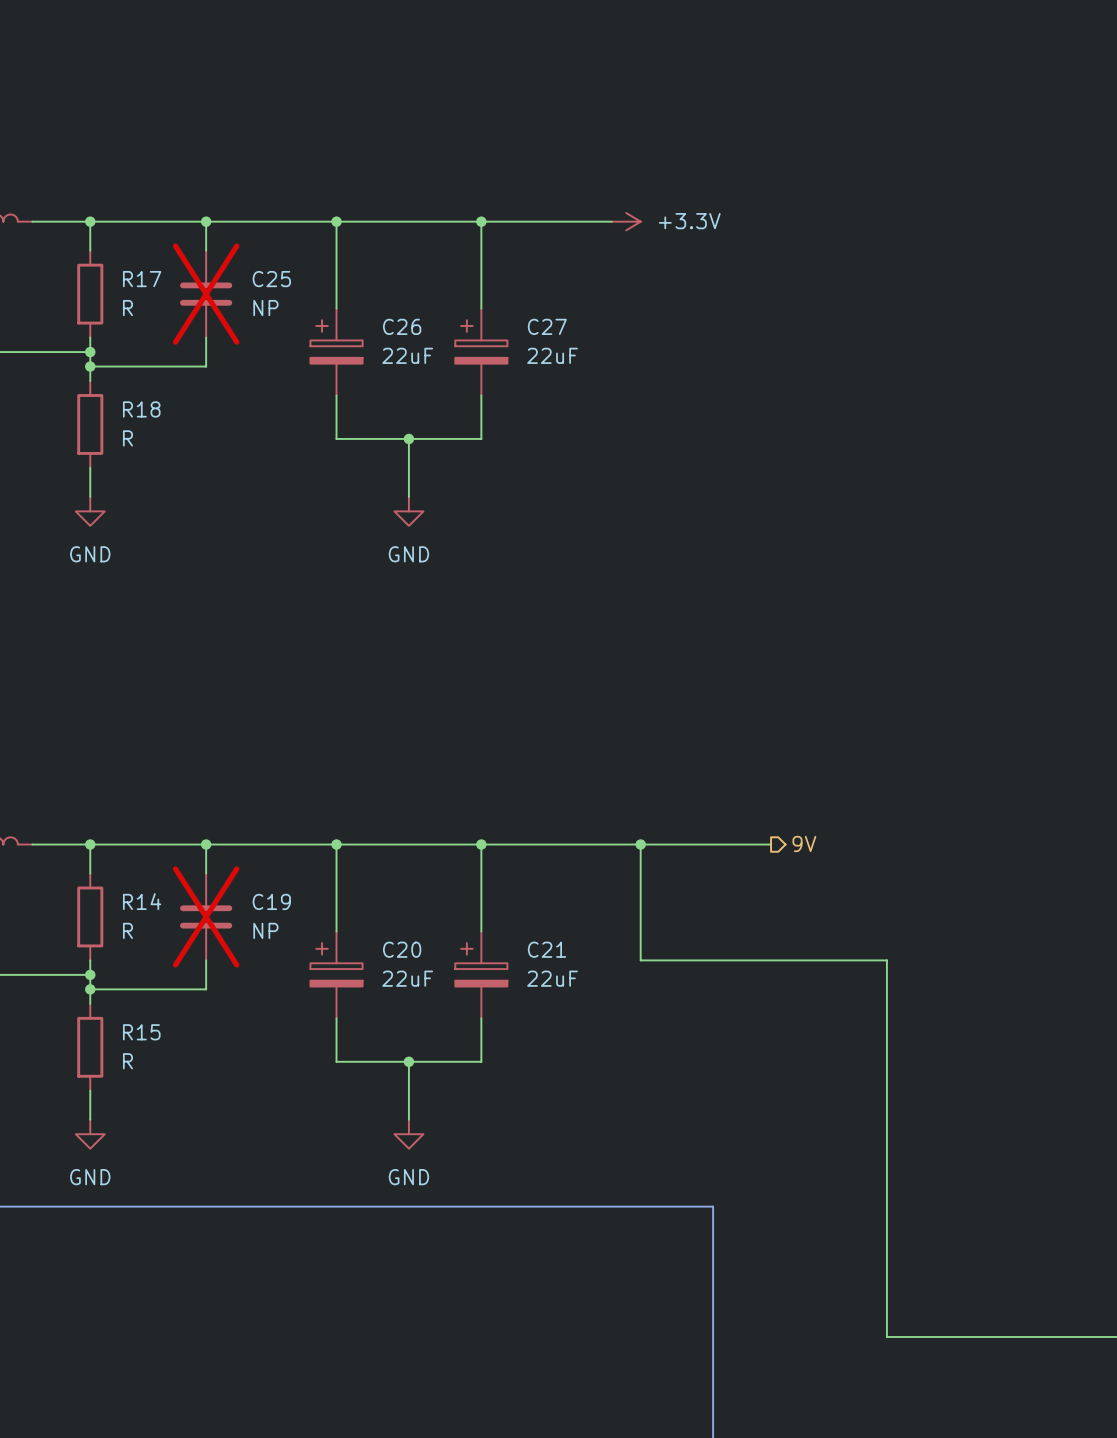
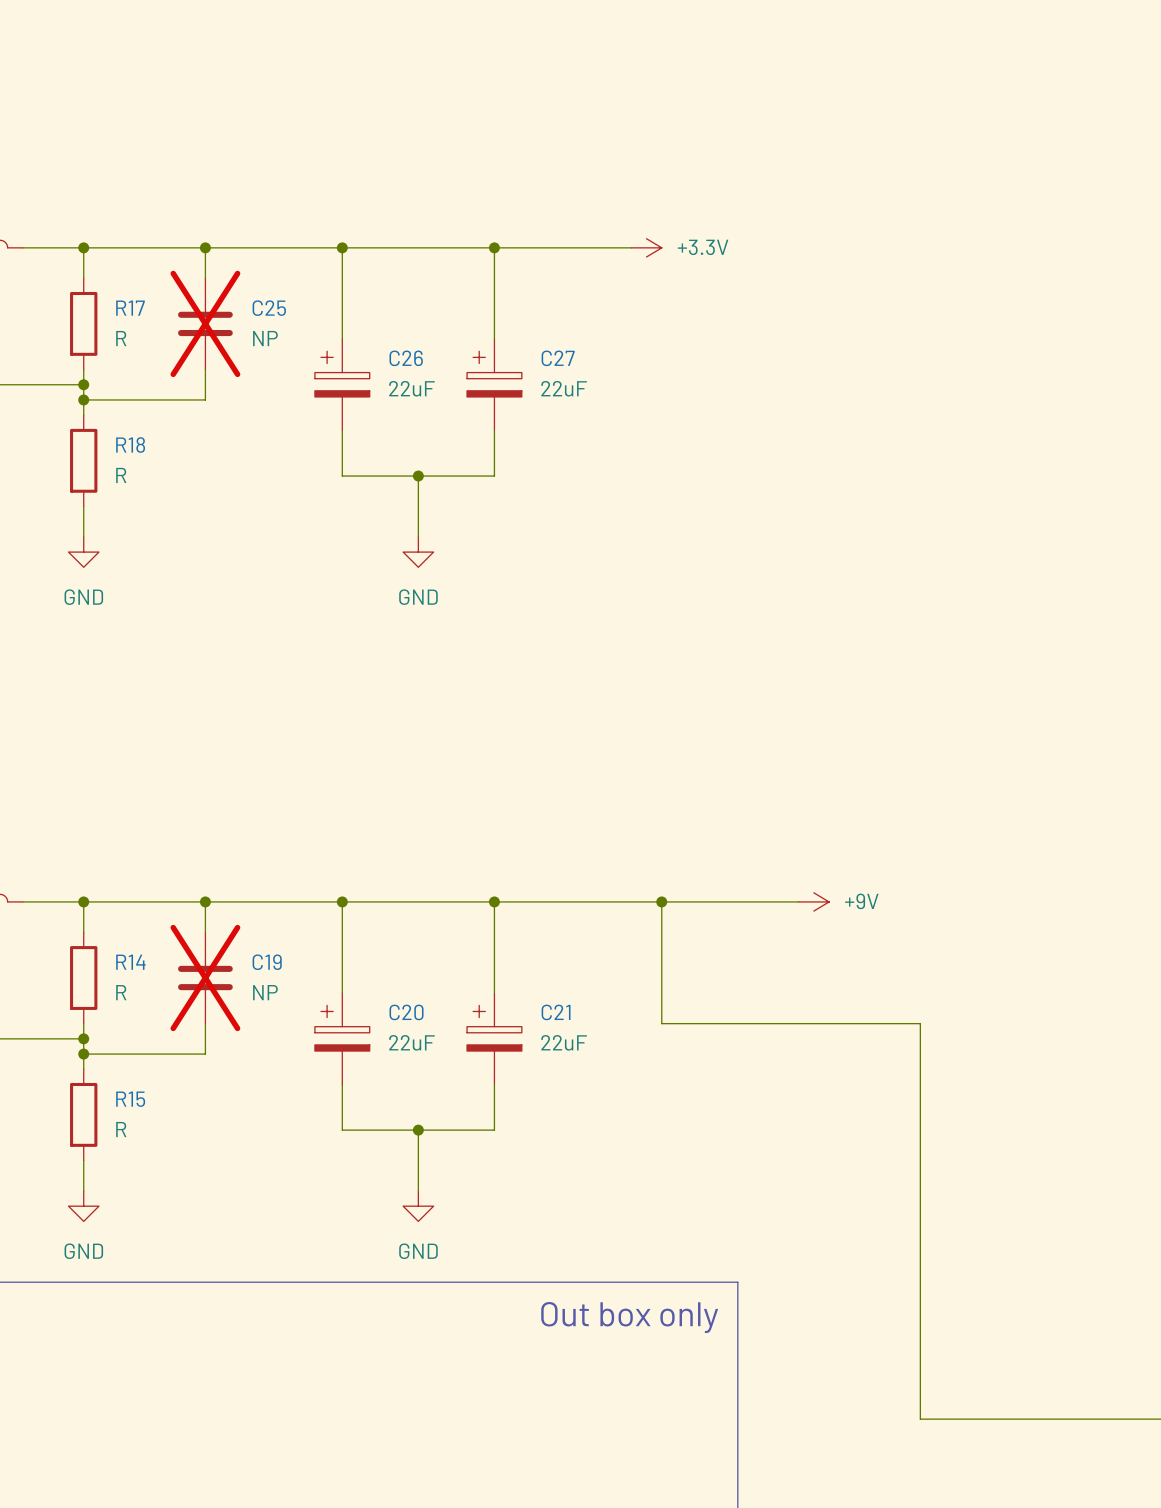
hierarchical label: 9V (804, 843) -> none
power symbol: none -> +9V (813, 901)
text: none -> Out box only (629, 1317)

